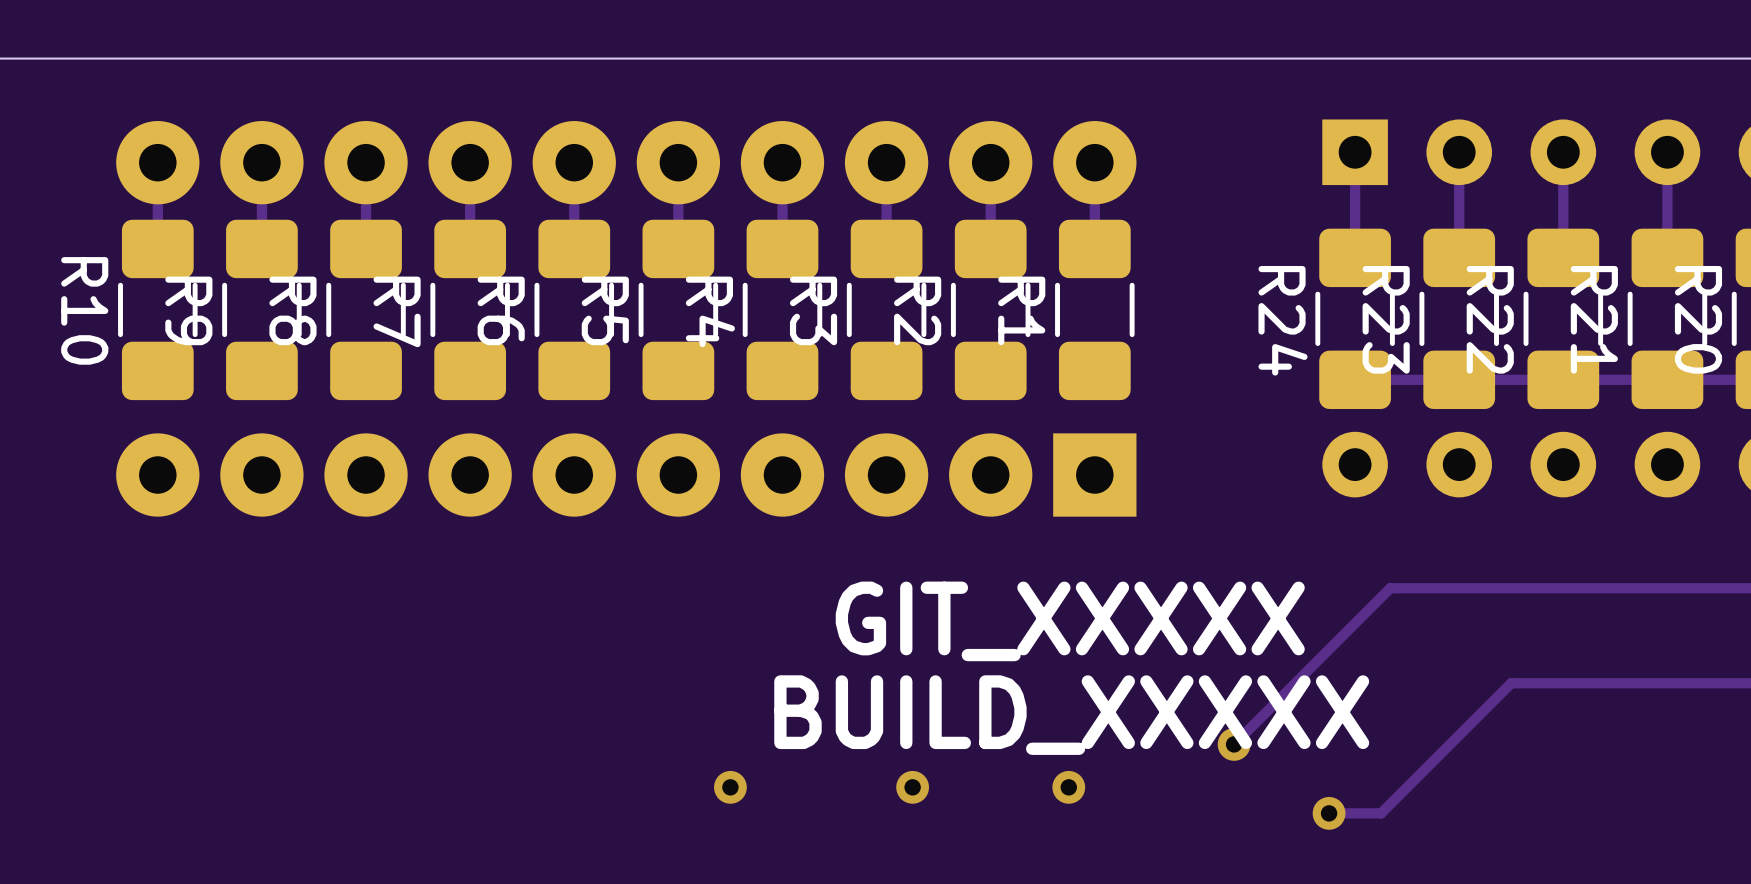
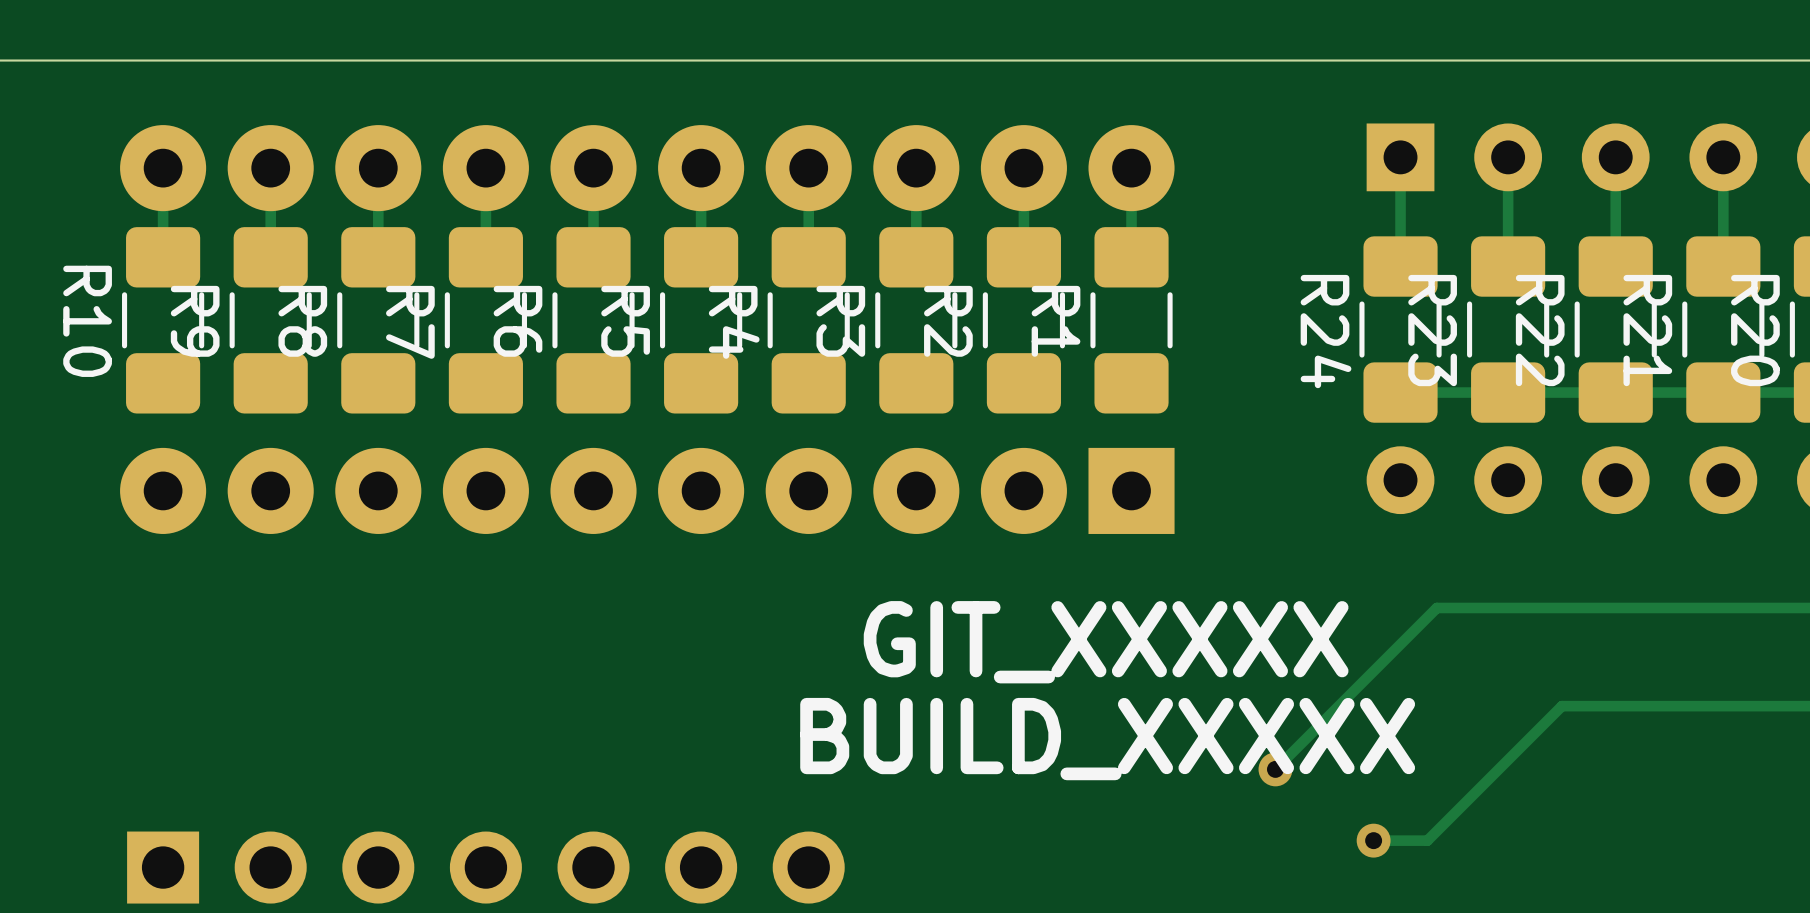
via: (730, 787) -> none
via: (912, 787) -> none
via: (1068, 787) -> none
part: none -> (485, 867)

